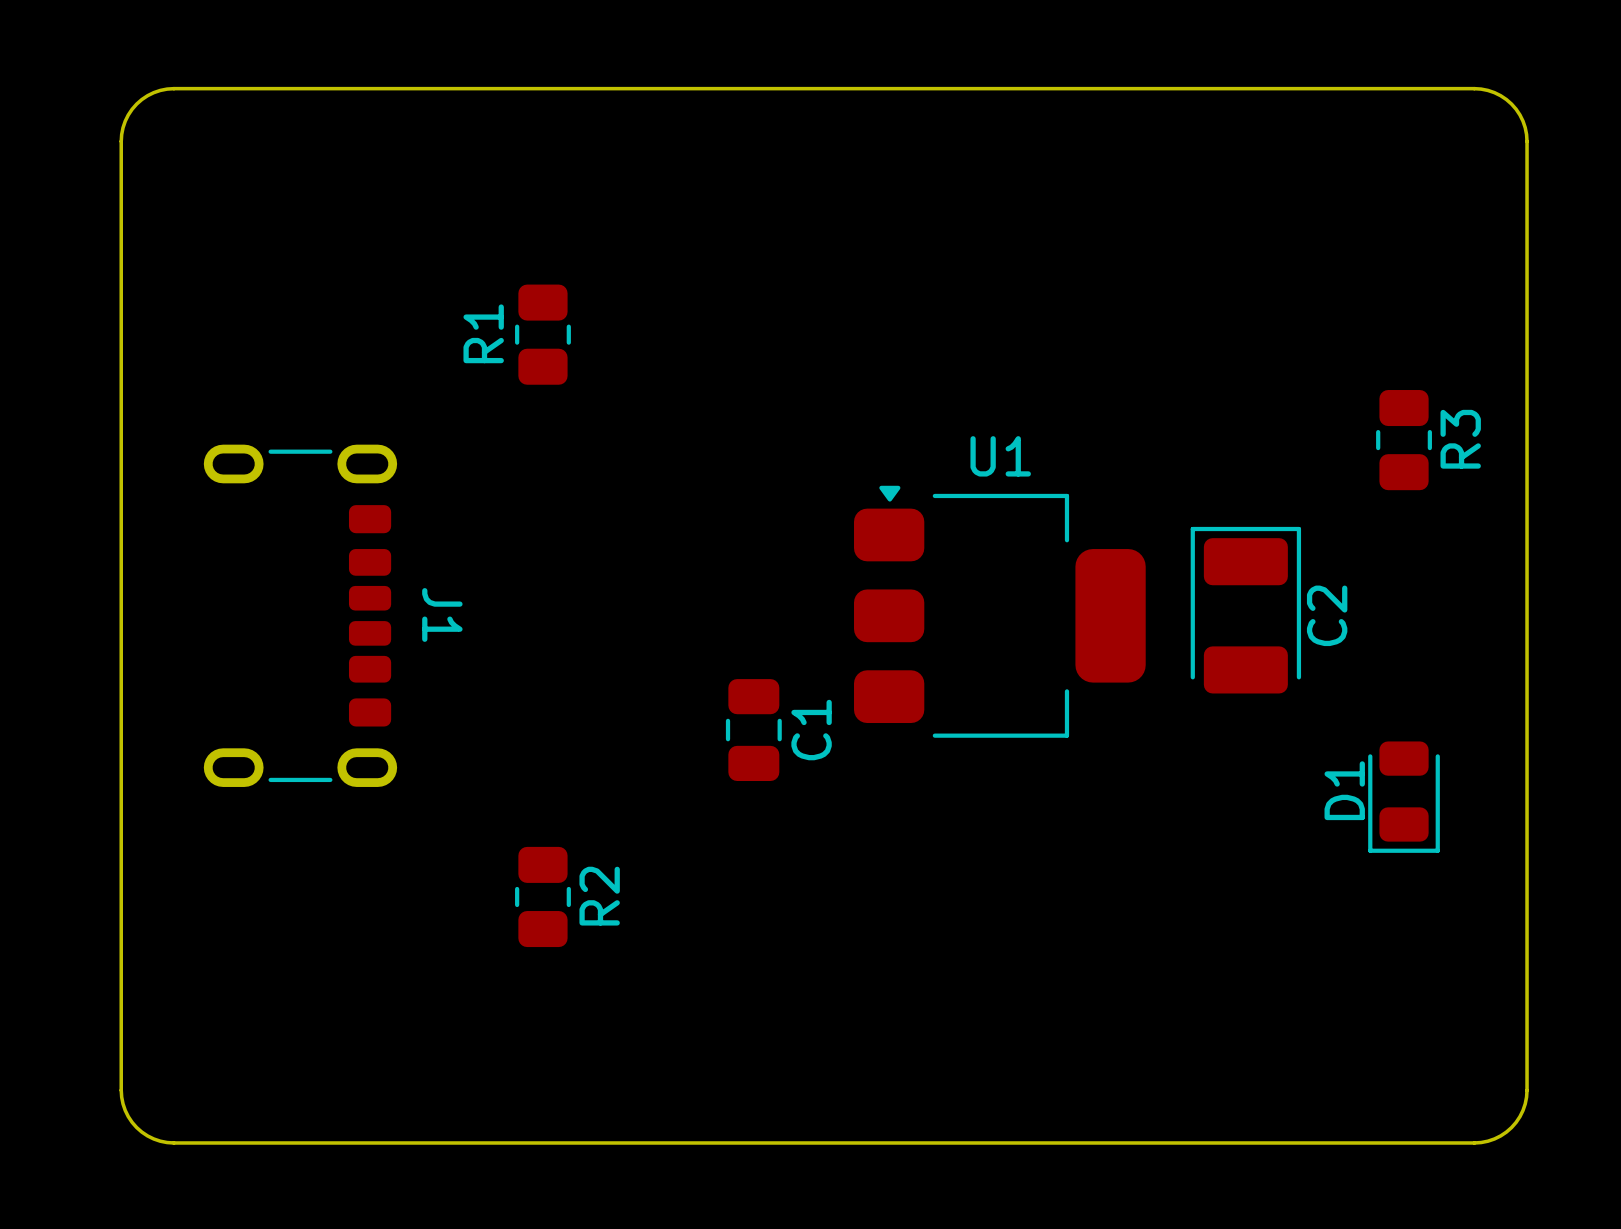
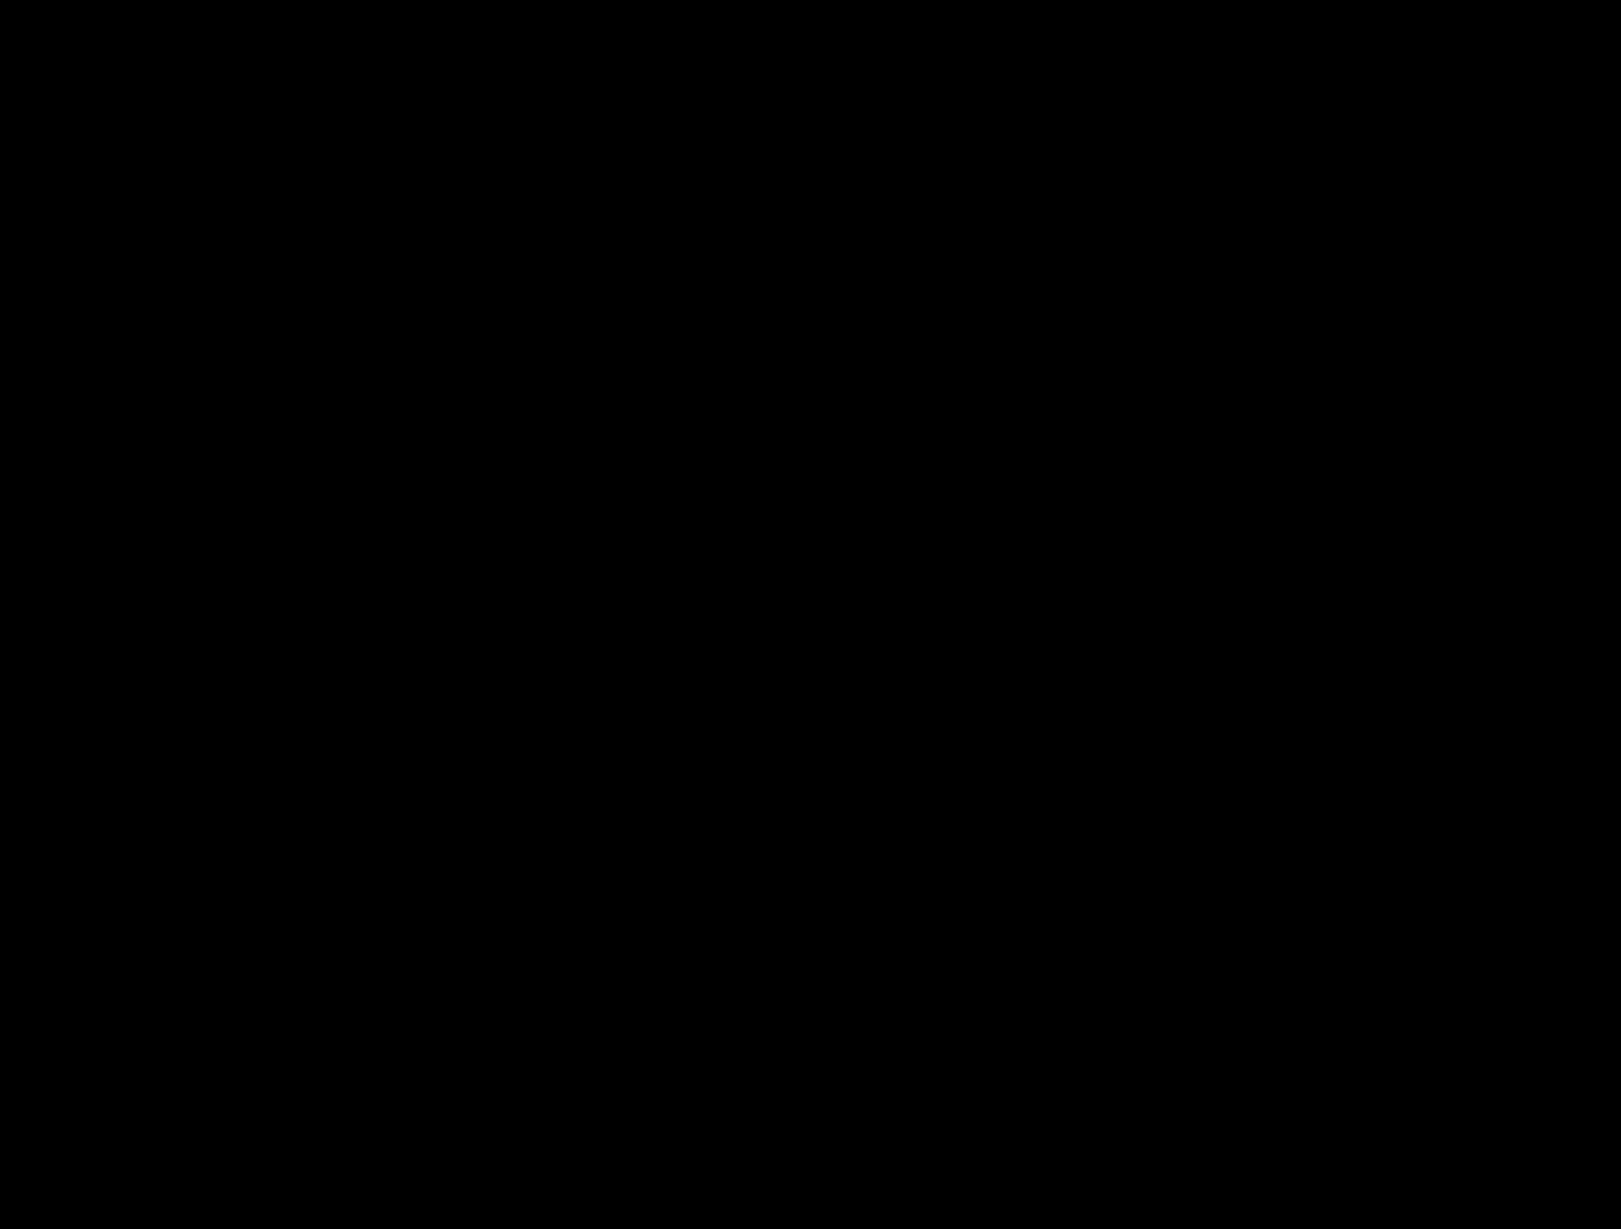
board edge: (173, 88) (1474, 88) (1487, 90) (1506, 99) (1519, 115) (1525, 127) (1527, 141) (1527, 1090) (1523, 1110) (1516, 1122) (1506, 1132) (1494, 1138) (1474, 1142) (173, 1142) (153, 1138) (141, 1132) (132, 1122) (125, 1110) (121, 1090) (121, 141) (125, 121) (136, 104) (153, 92) (173, 88) -> none
R1: (542, 334) -> none
R3: (1404, 440) -> none
C2: (1245, 610) -> none
U1: (999, 611) -> none
J1: (300, 615) -> none
C1: (753, 730) -> none
D1: (1404, 797) -> none
R2: (542, 896) -> none

